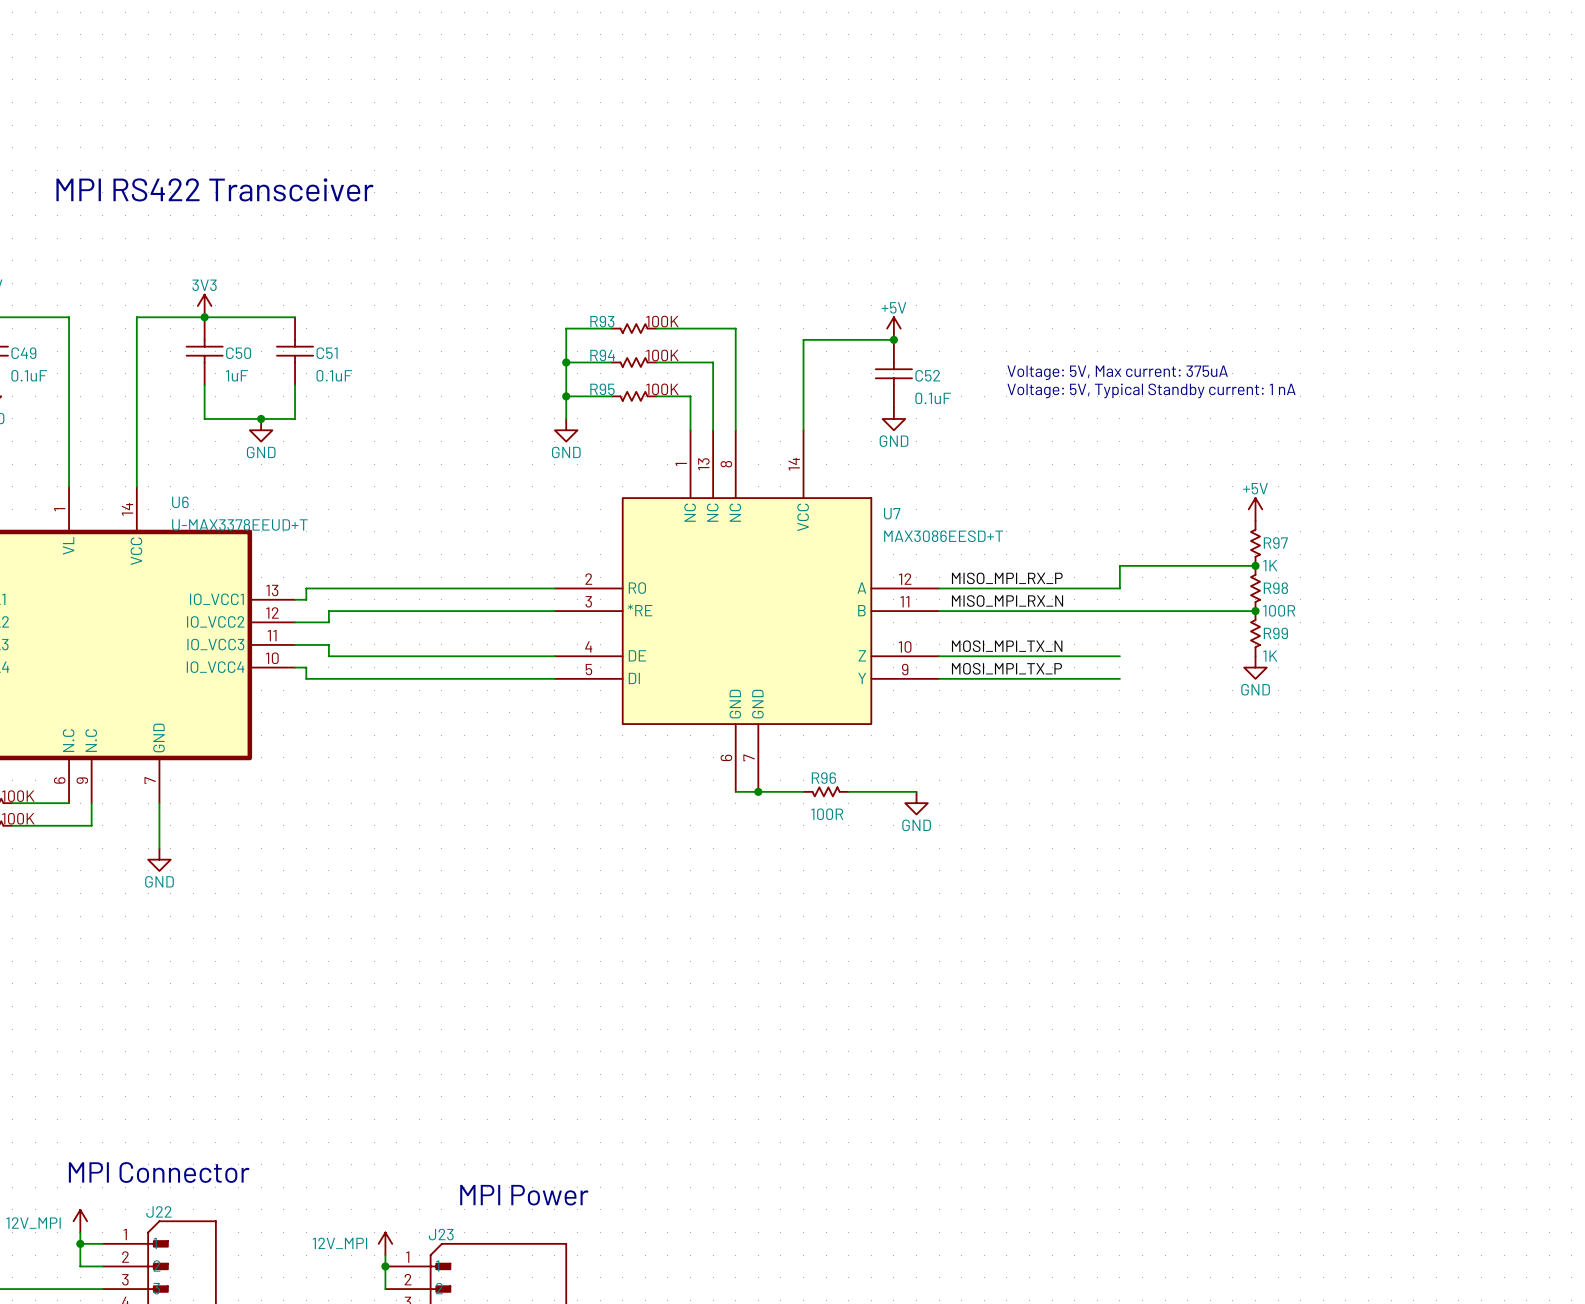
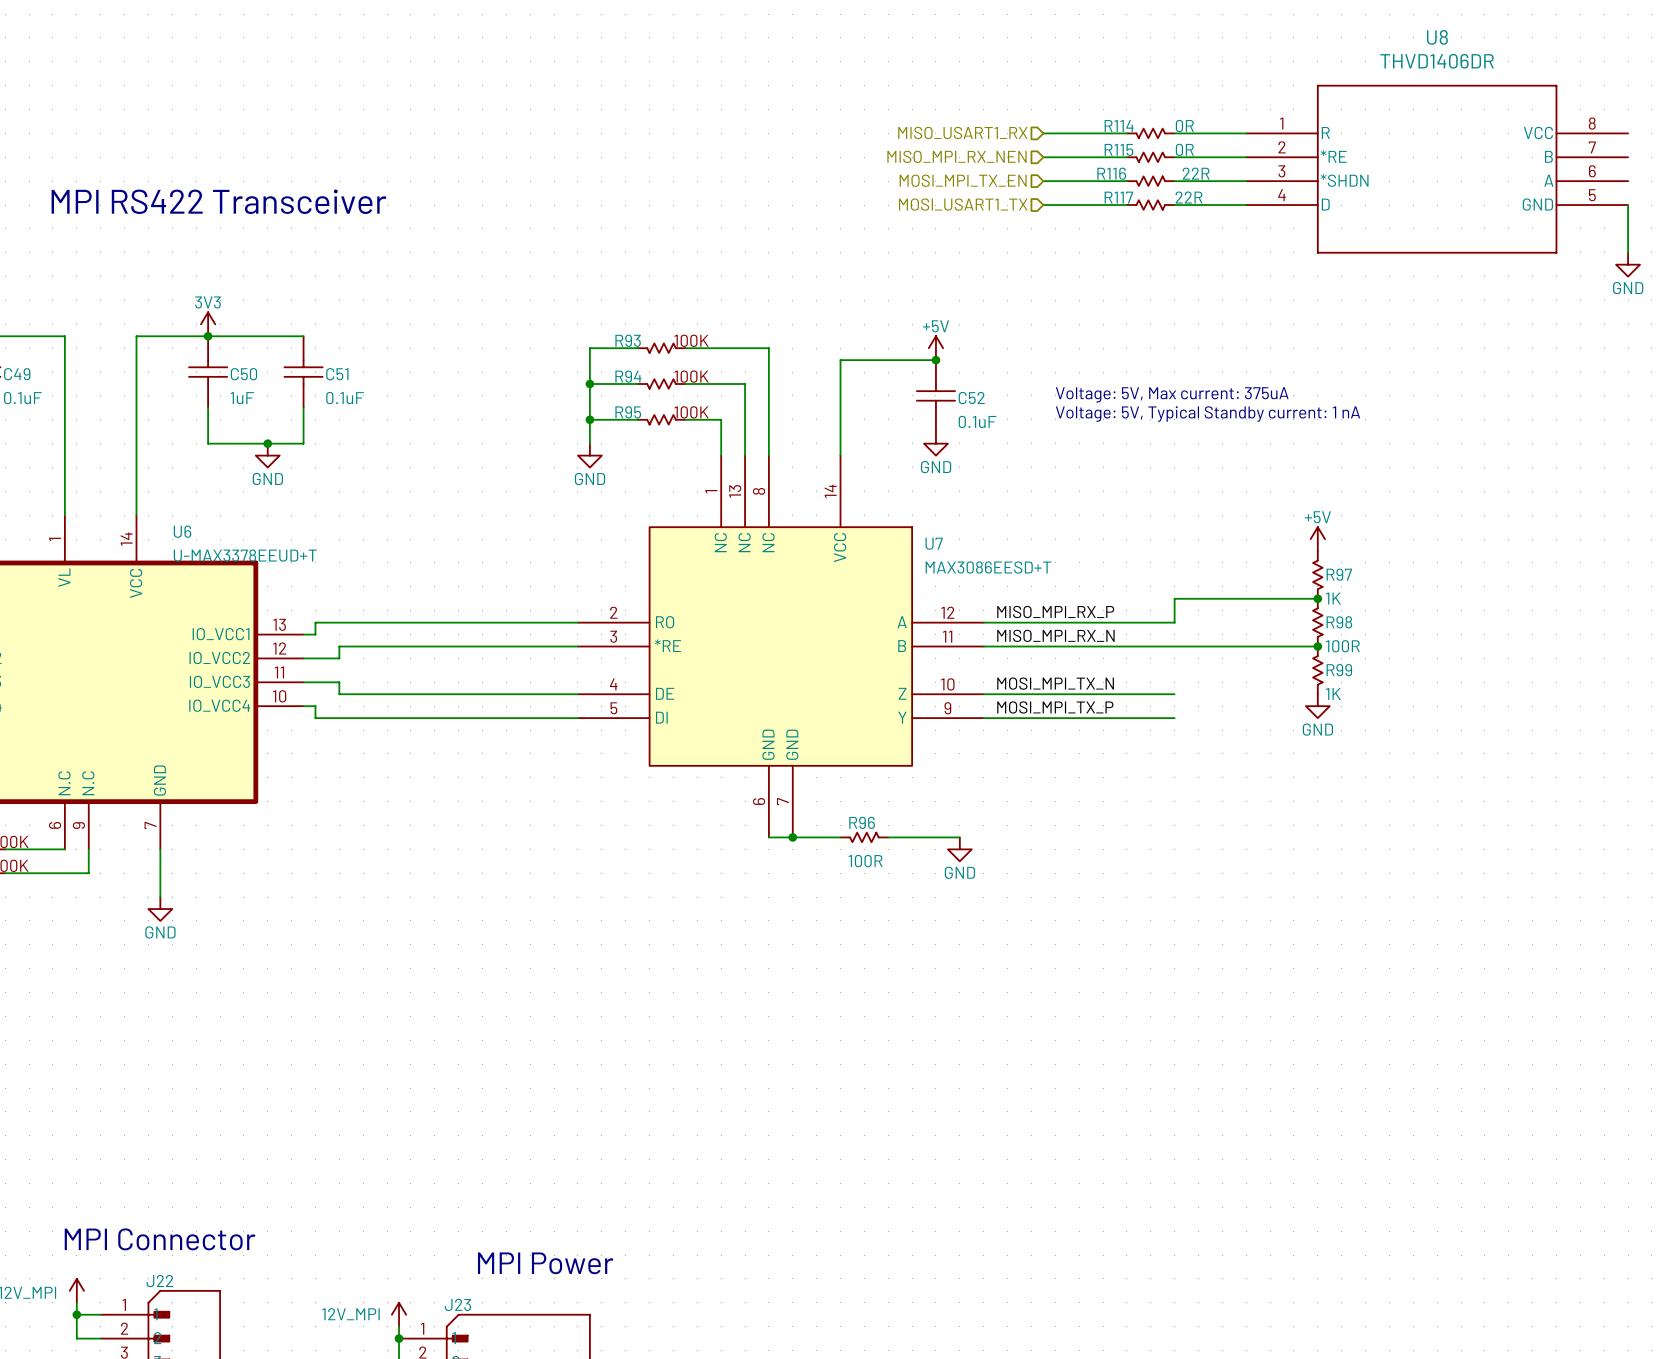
hierarchical label: none -> MISO_USART1_RX (962, 132)
wire: none -> (1043, 133) (1126, 133)
R114: none -> (1150, 133)
wire: none -> (1174, 133) (1246, 133)
hierarchical label: none -> MISO_MPI_RX_NEN (956, 156)
wire: none -> (1043, 157) (1126, 157)
R115: none -> (1150, 157)
wire: none -> (1174, 157) (1246, 157)
U8: none -> THVD1406DR (1437, 169)
hierarchical label: none -> MOSI_MPI_TX_EN (963, 180)
wire: none -> (1043, 181) (1126, 181)
R116: none -> (1150, 181)
wire: none -> (1174, 181) (1246, 181)
hierarchical label: none -> MOSI_USART1_TX (963, 204)
wire: none -> (1043, 205) (1126, 205)
R117: none -> (1150, 205)
wire: none -> (1174, 205) (1246, 205)
wire: none -> (1628, 205) (1628, 252)
power symbol: none -> GND (1628, 264)

